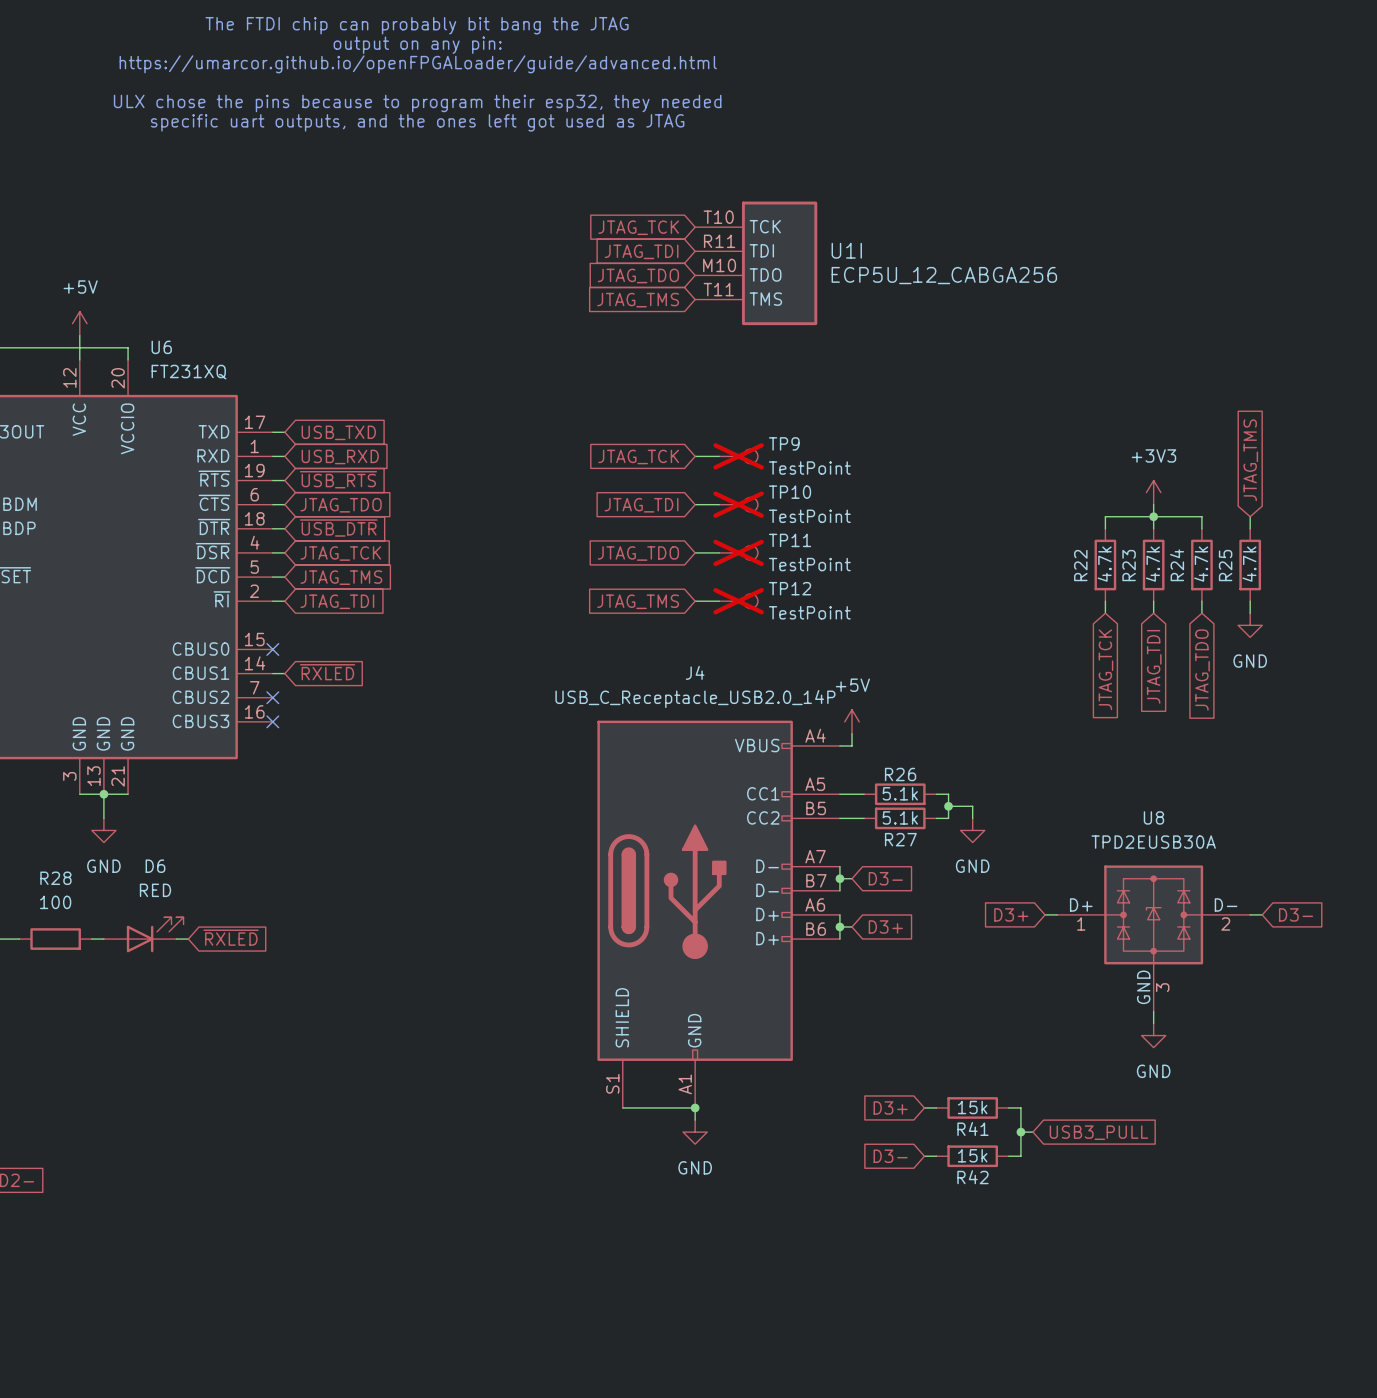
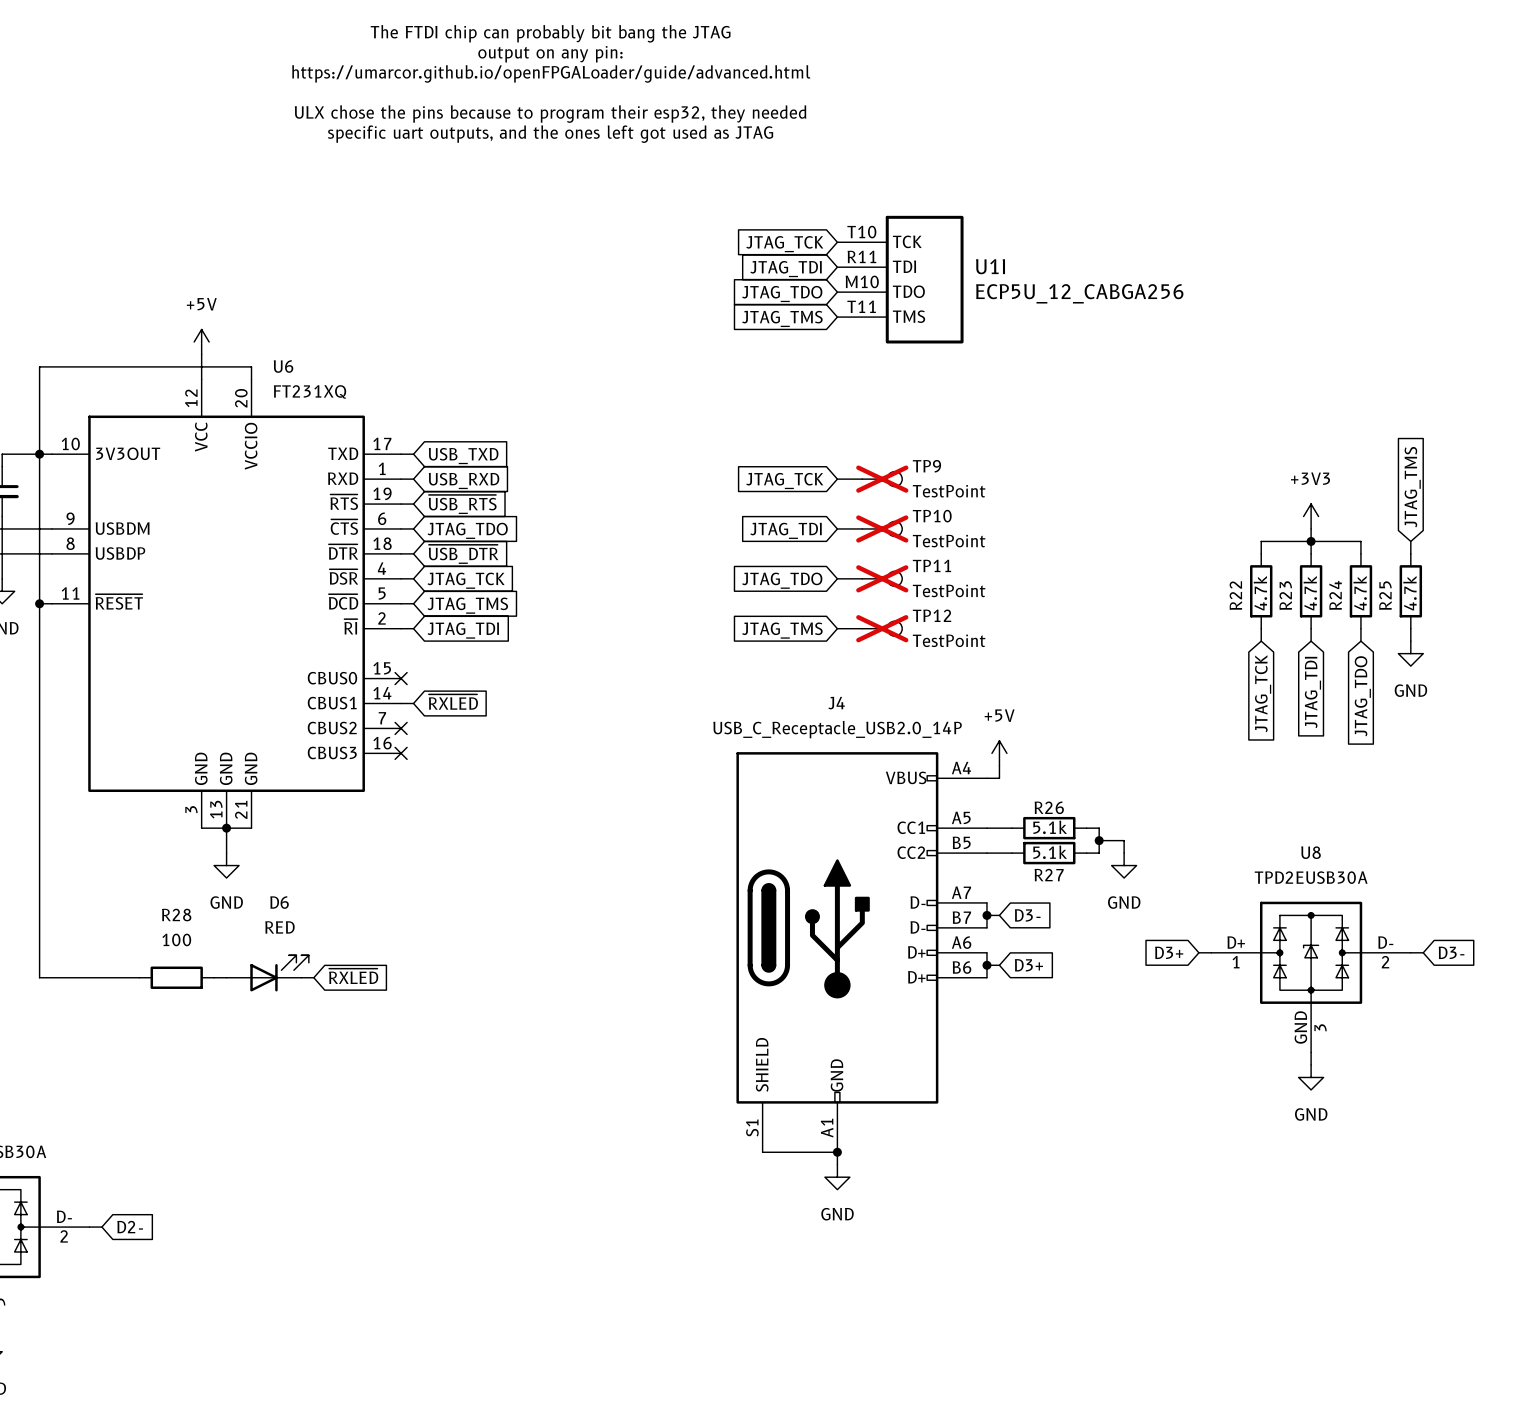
global label: D3+ (890, 1107) -> none
wire: (924, 1107) (936, 1107) -> none
R41: 15k (972, 1107) -> none
wire: (1008, 1107) (1020, 1107) (1020, 1156) (1008, 1156) -> none
wire: (1020, 1132) (1033, 1132) -> none
junction: (1020, 1132) -> none
global label: USB3_PULL (1098, 1132) -> none
global label: D3- (890, 1156) -> none
wire: (924, 1156) (936, 1156) -> none
R42: 15k (972, 1156) -> none

